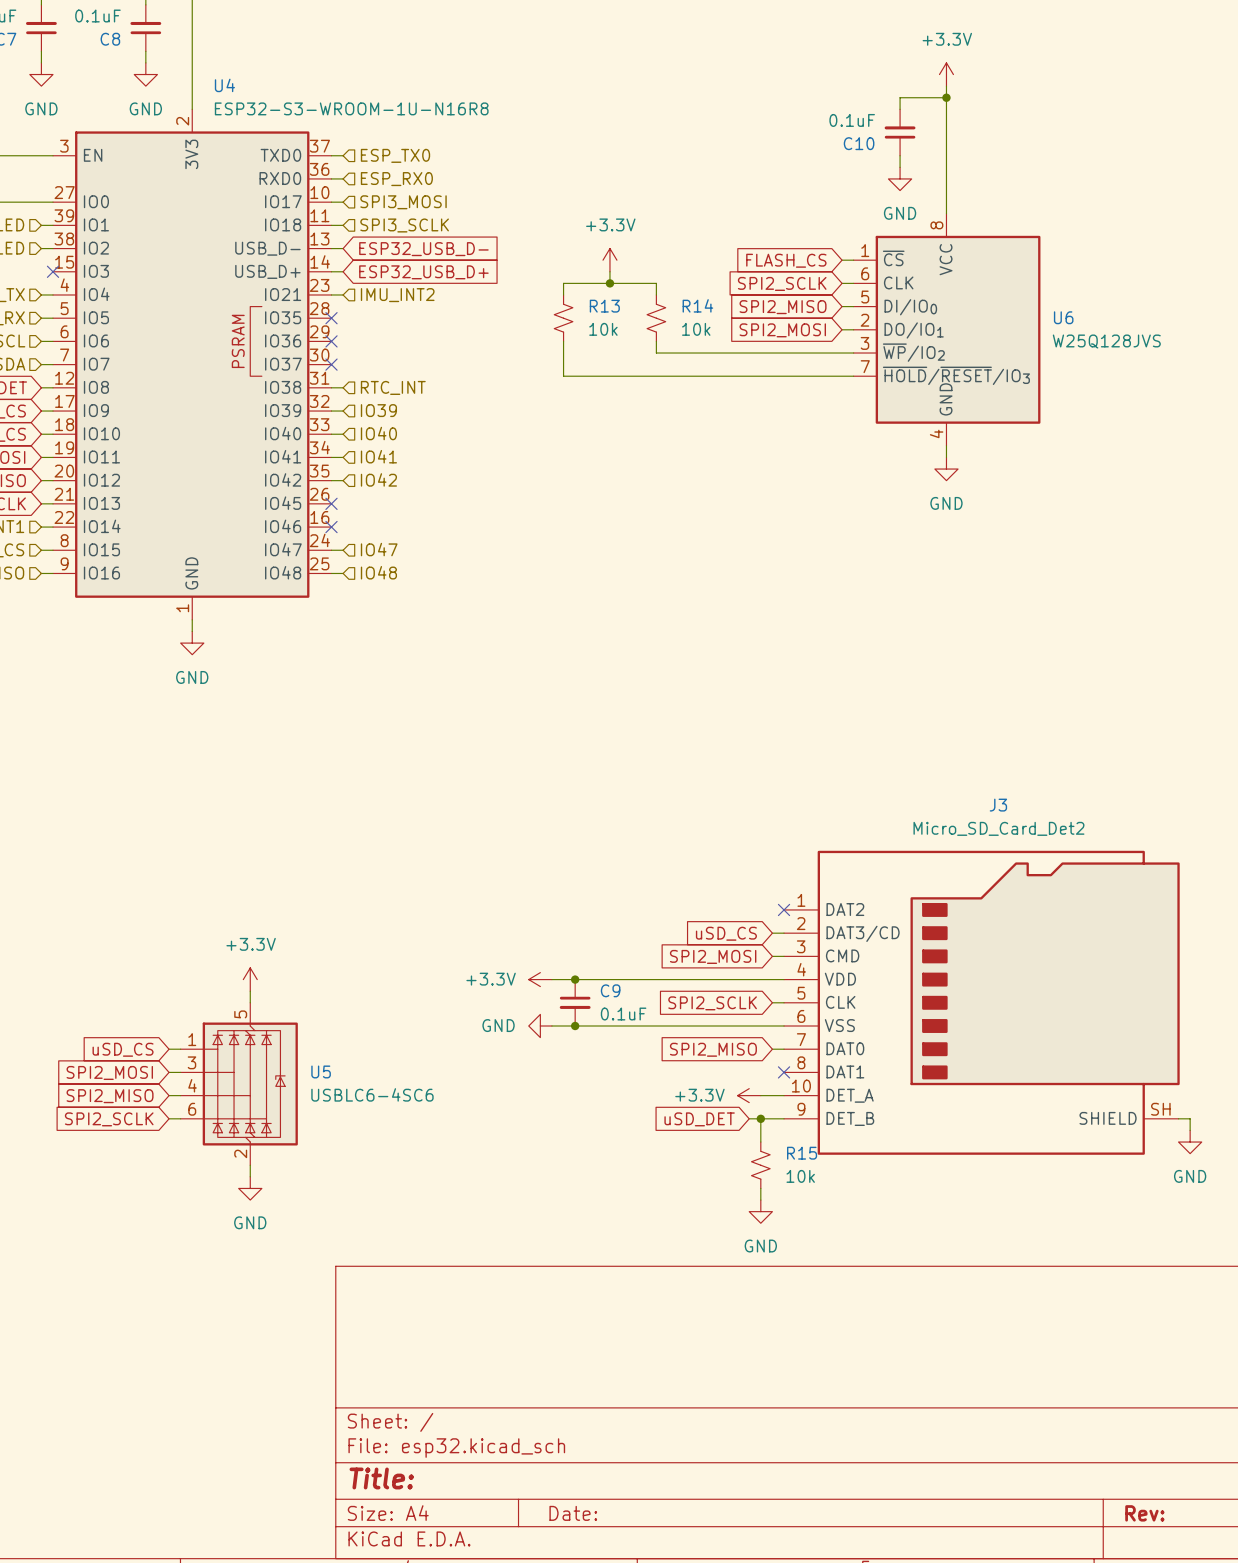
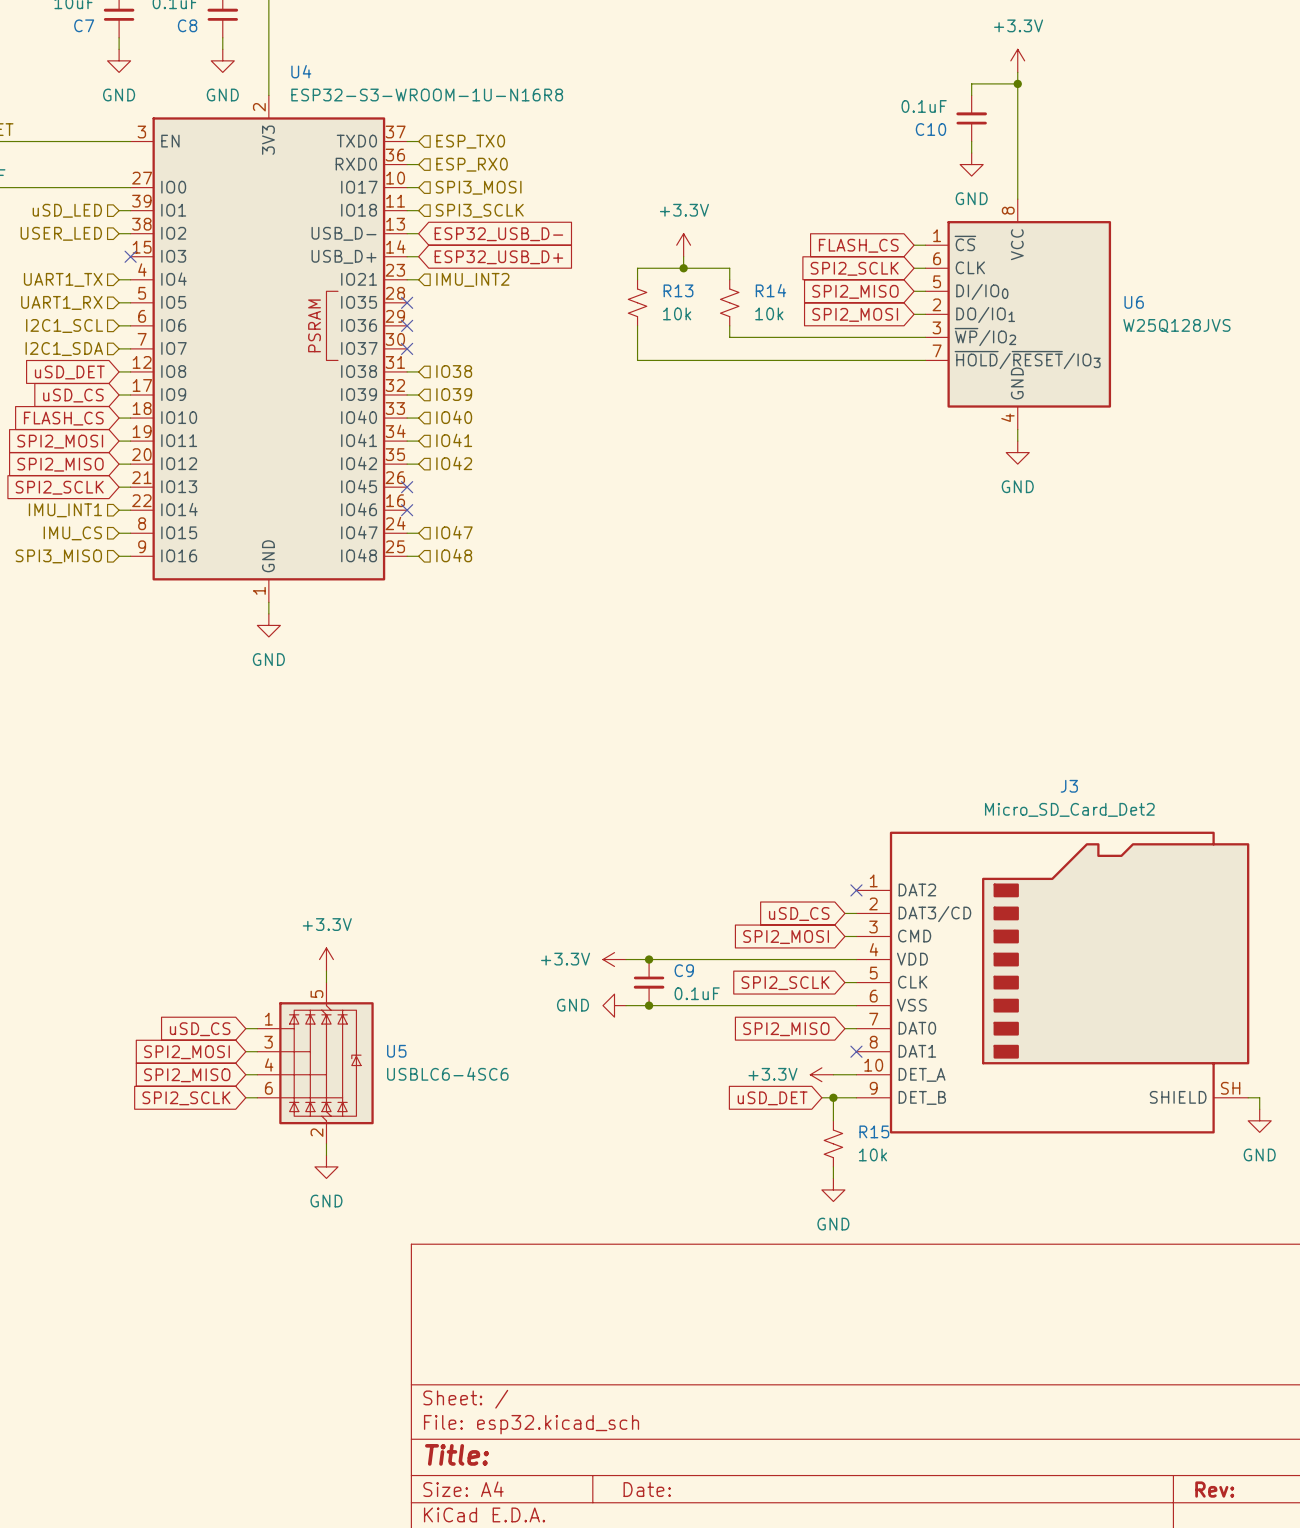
hierarchical label: RTC_INT (393, 387) -> IO38 (454, 371)

